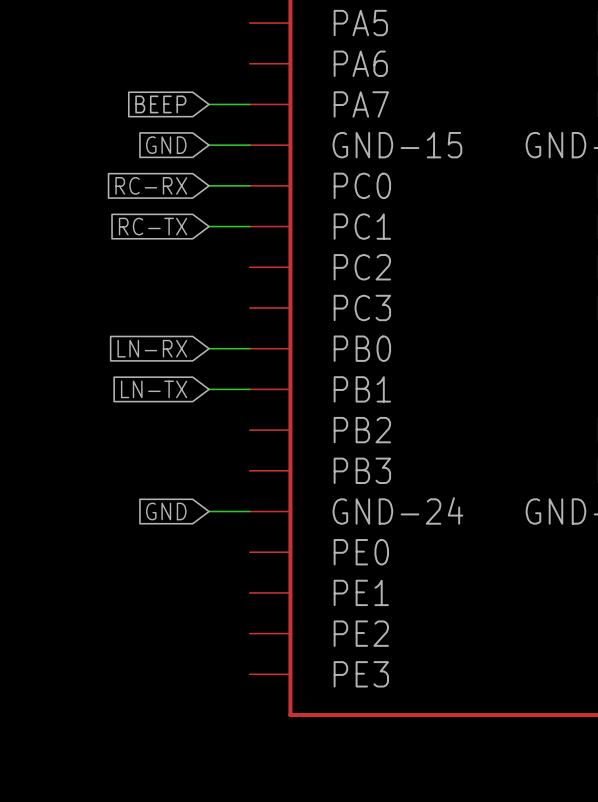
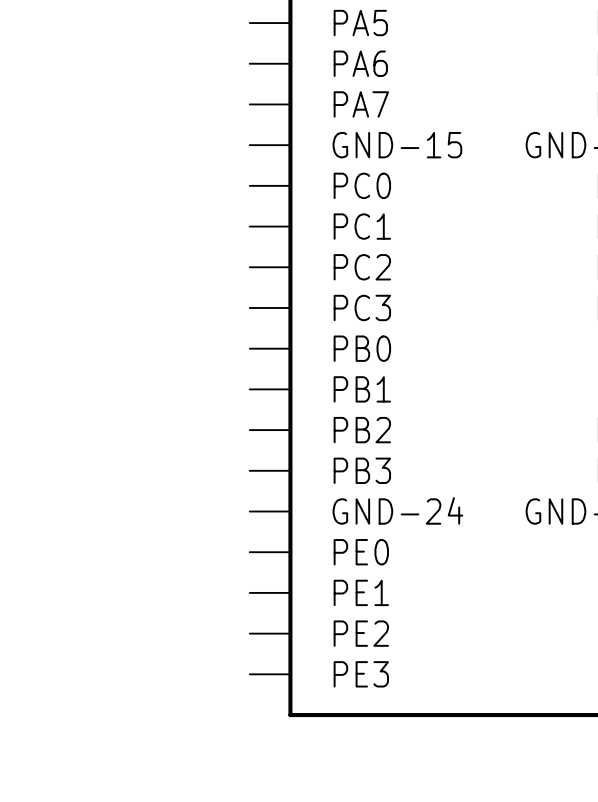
global label: BEEP (160, 104) -> none
wire: (209, 104) (249, 104) -> none
global label: GND (166, 145) -> none
wire: (209, 145) (249, 145) -> none
global label: RC-RX (151, 185) -> none
wire: (209, 185) (249, 185) -> none
global label: RC-TX (153, 226) -> none
wire: (209, 226) (249, 226) -> none
global label: LN-RX (152, 348) -> none
wire: (209, 348) (249, 348) -> none
global label: LN-TX (154, 389) -> none
wire: (209, 389) (249, 389) -> none
global label: GND (166, 511) -> none
wire: (209, 511) (249, 511) -> none

